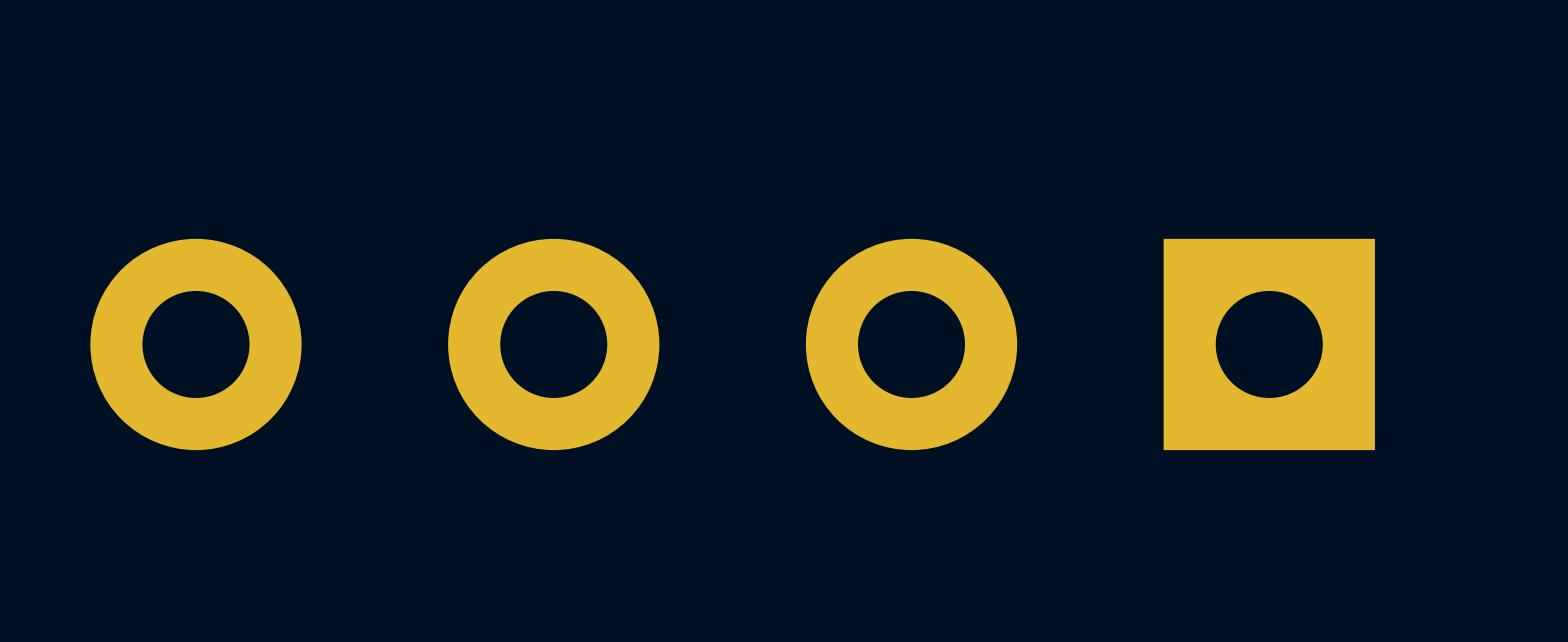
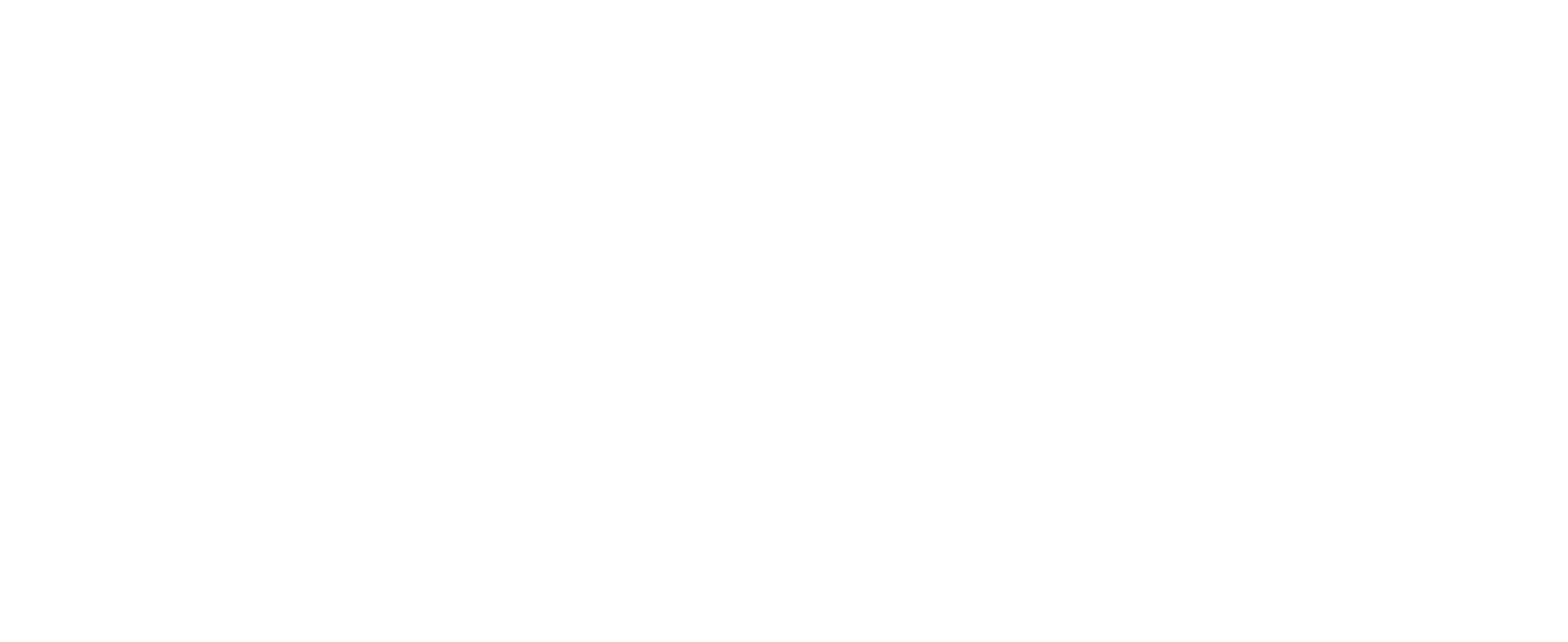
part: (732, 344) -> none

